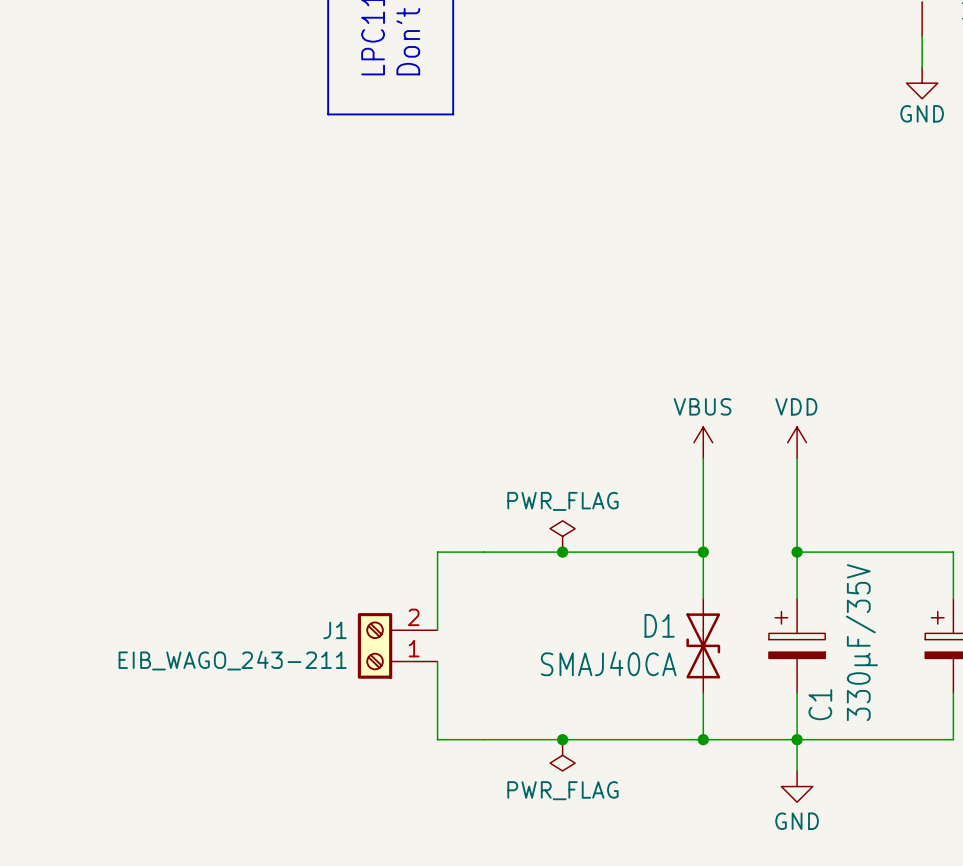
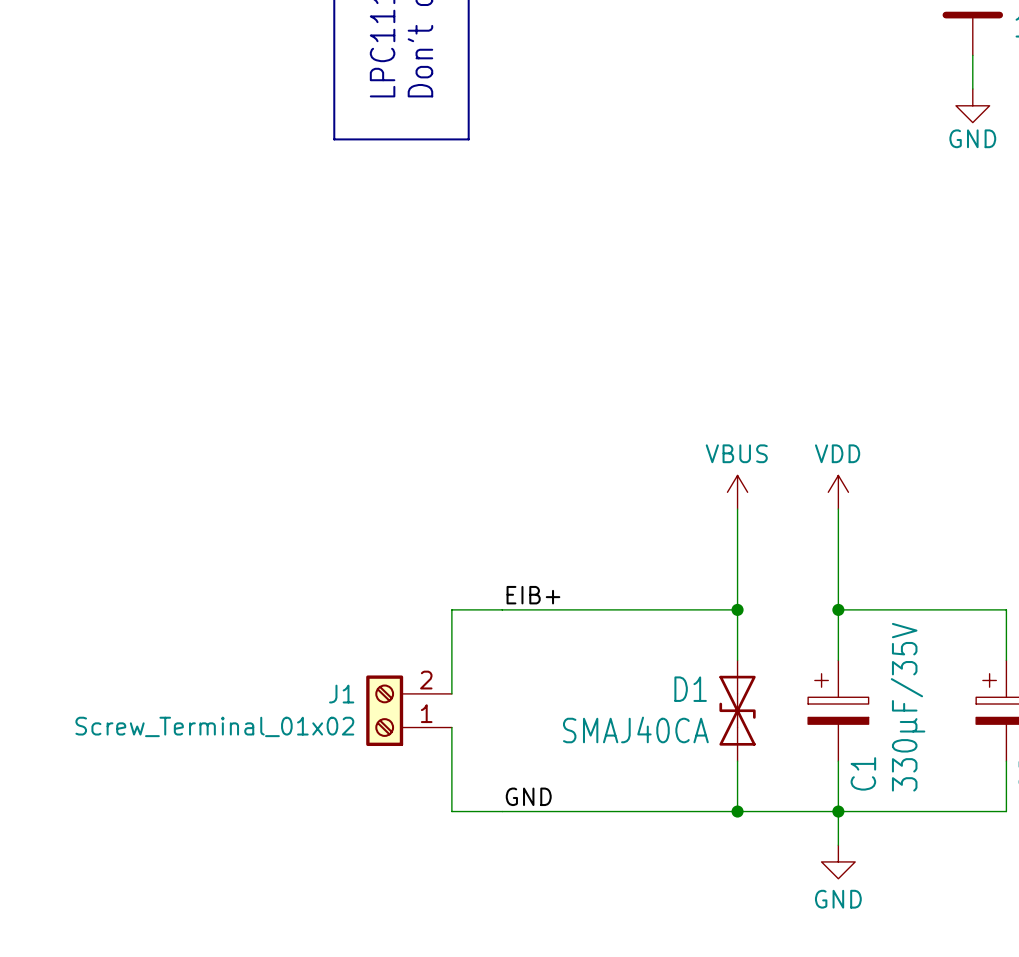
power symbol: PWR_FLAG (562, 536) -> none
label: none -> EIB+ (533, 595)
junction: (562, 552) -> none
J1 value: EIB_WAGO_243-211 (232, 660) -> Screw_Terminal_01x02 (214, 726)
label: none -> GND (528, 796)
junction: (562, 739) -> none
power symbol: PWR_FLAG (562, 755) -> none

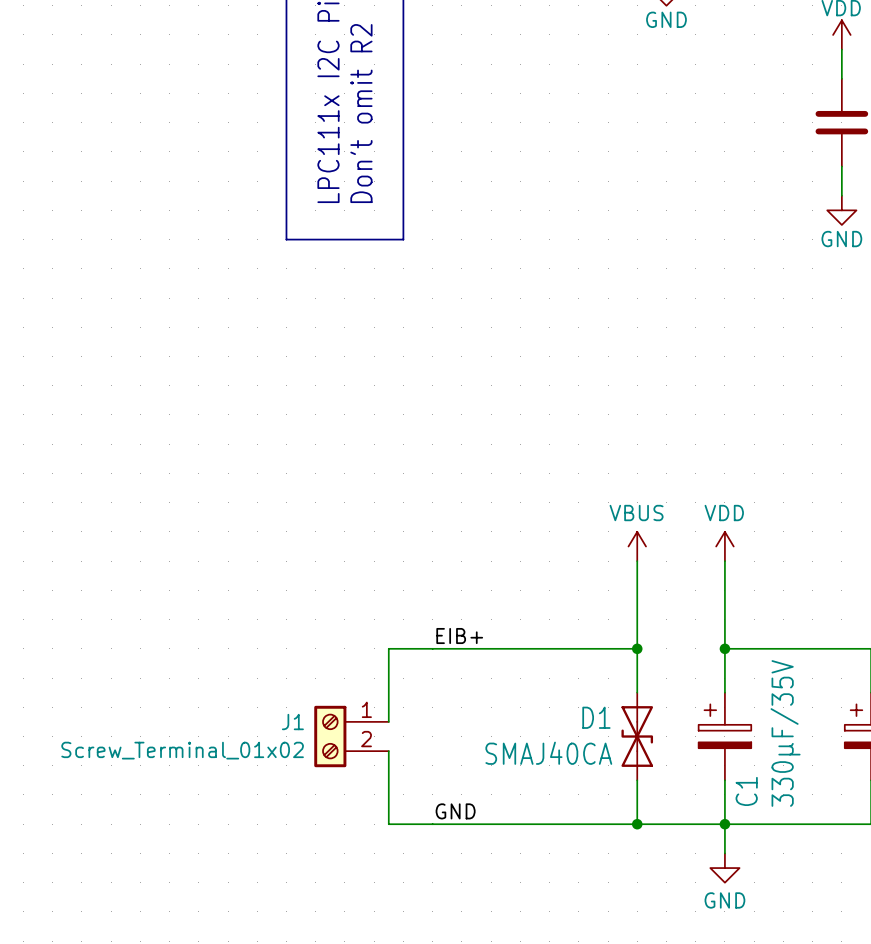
J1 flip: as is (384, 710) -> up-down (330, 736)

